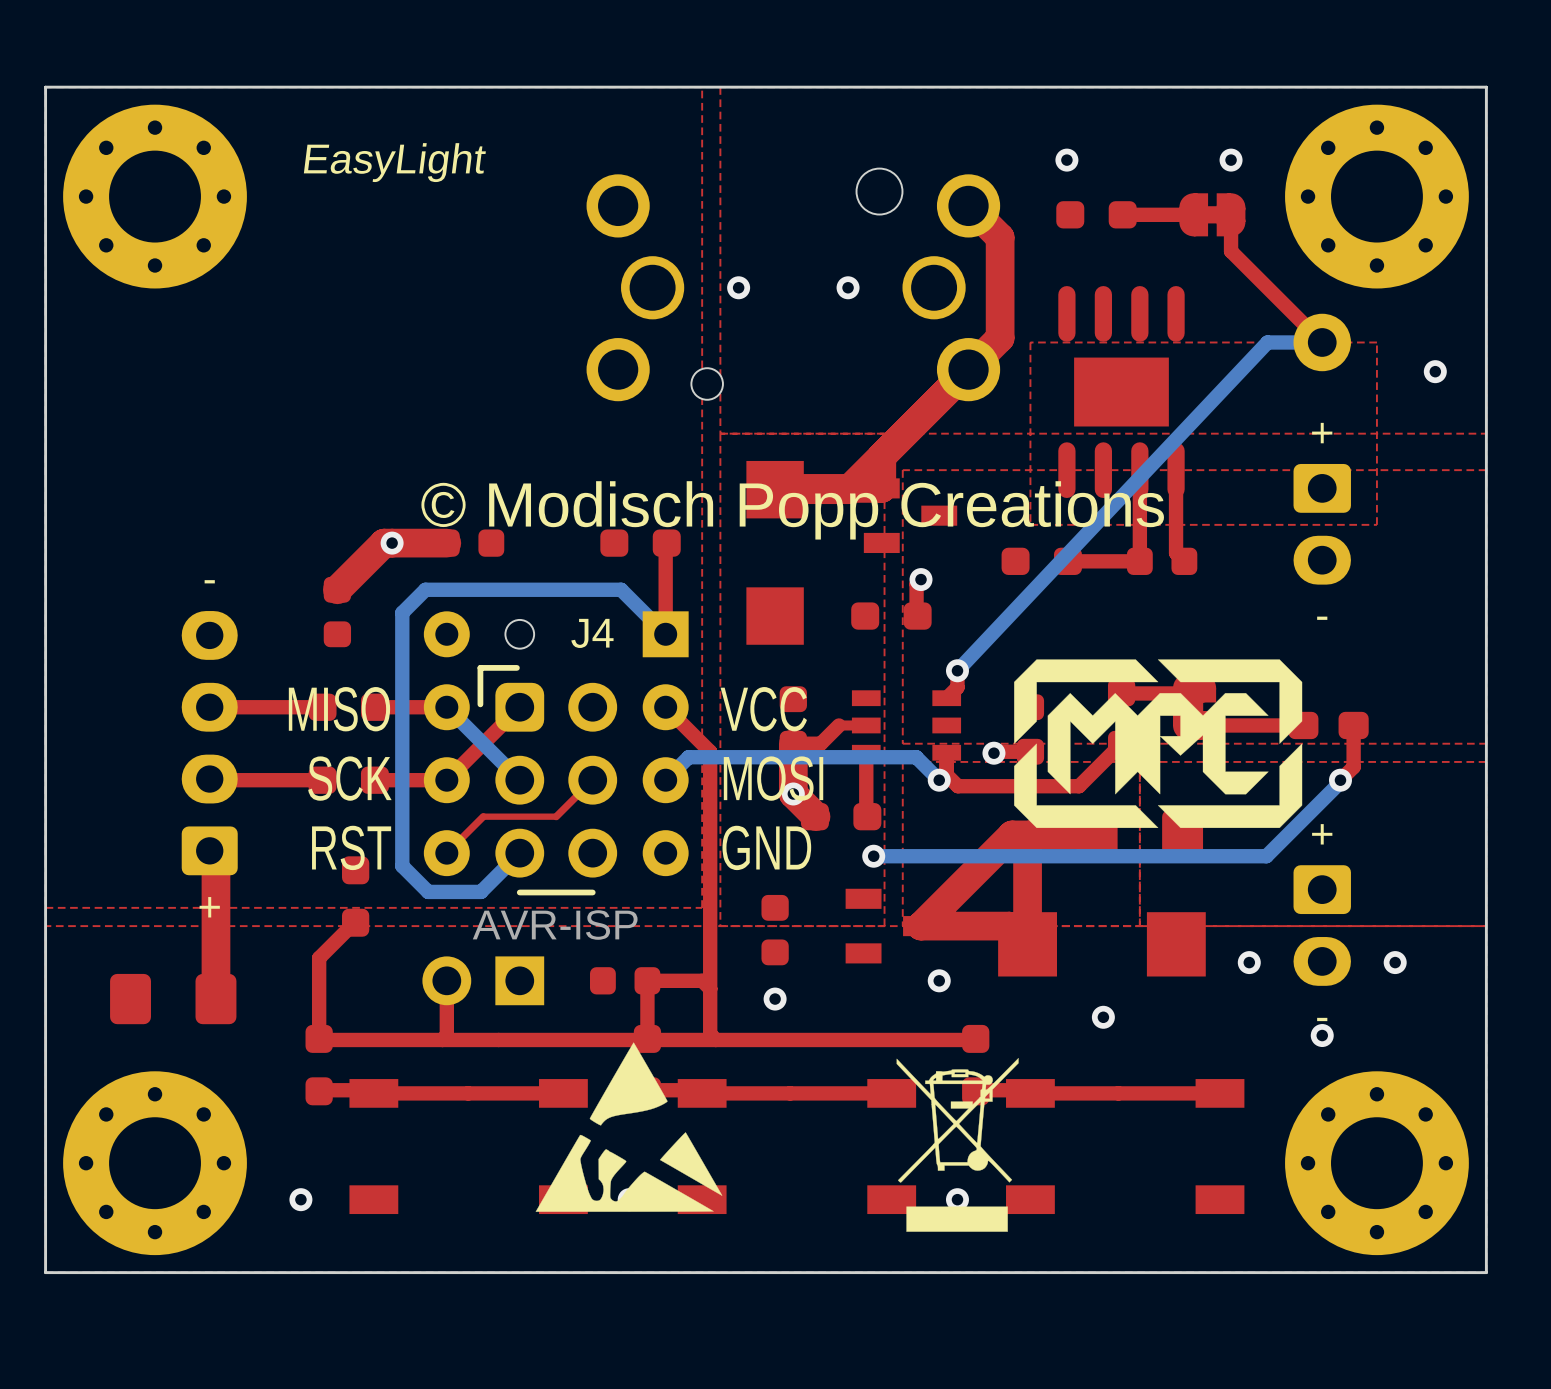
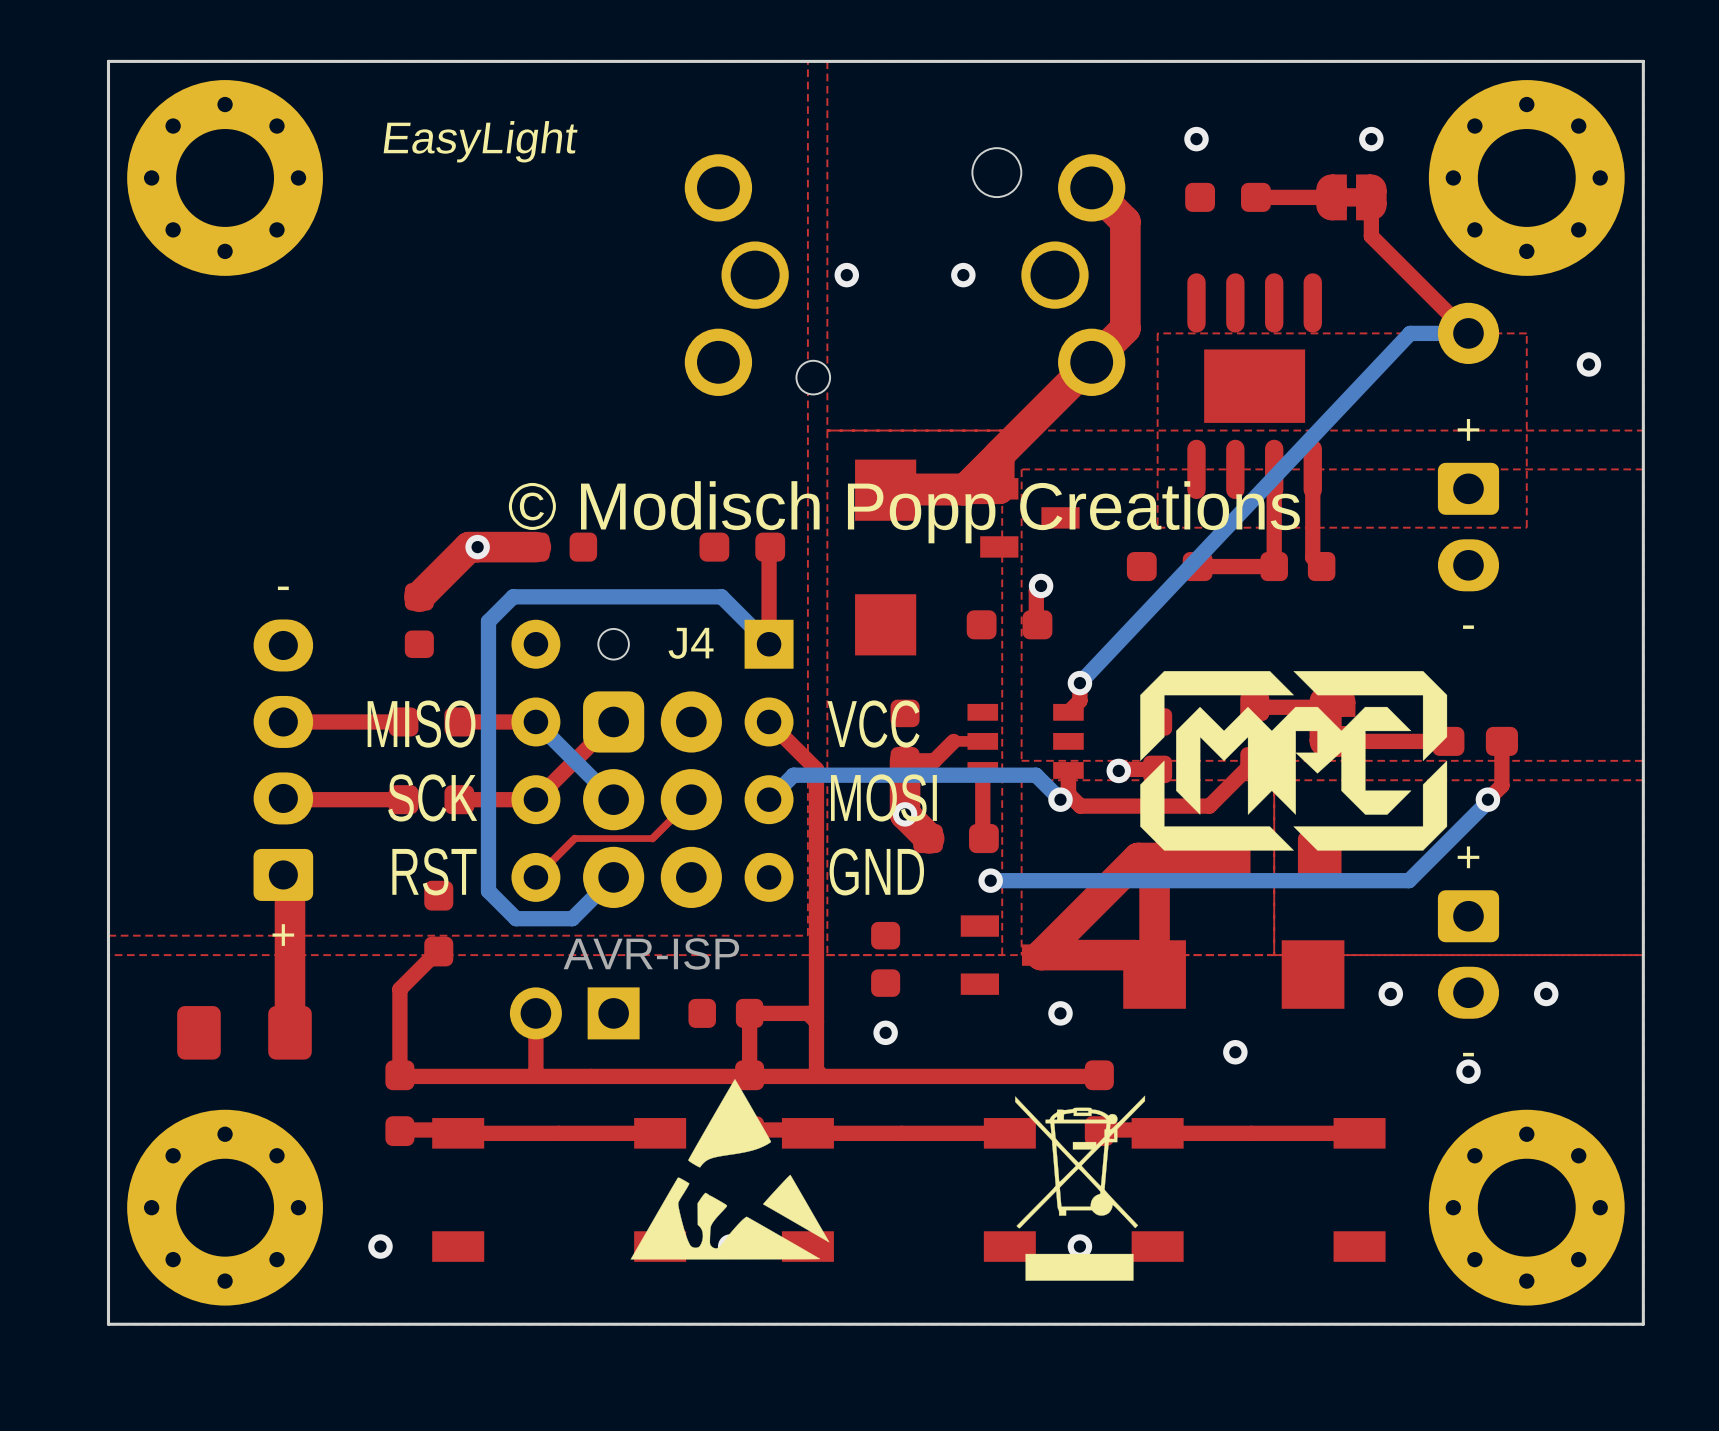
J4 footprint: [477, 619, 618, 896] -> [583, 628, 722, 908]

